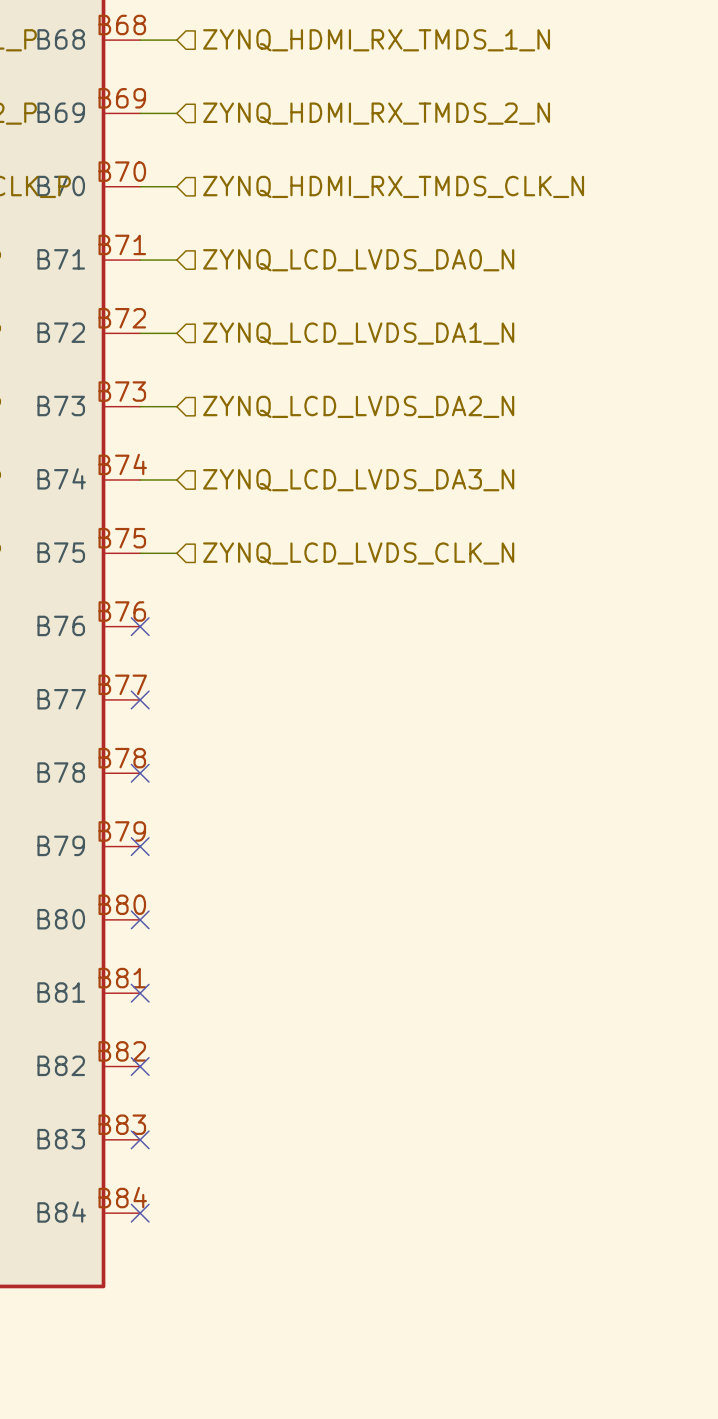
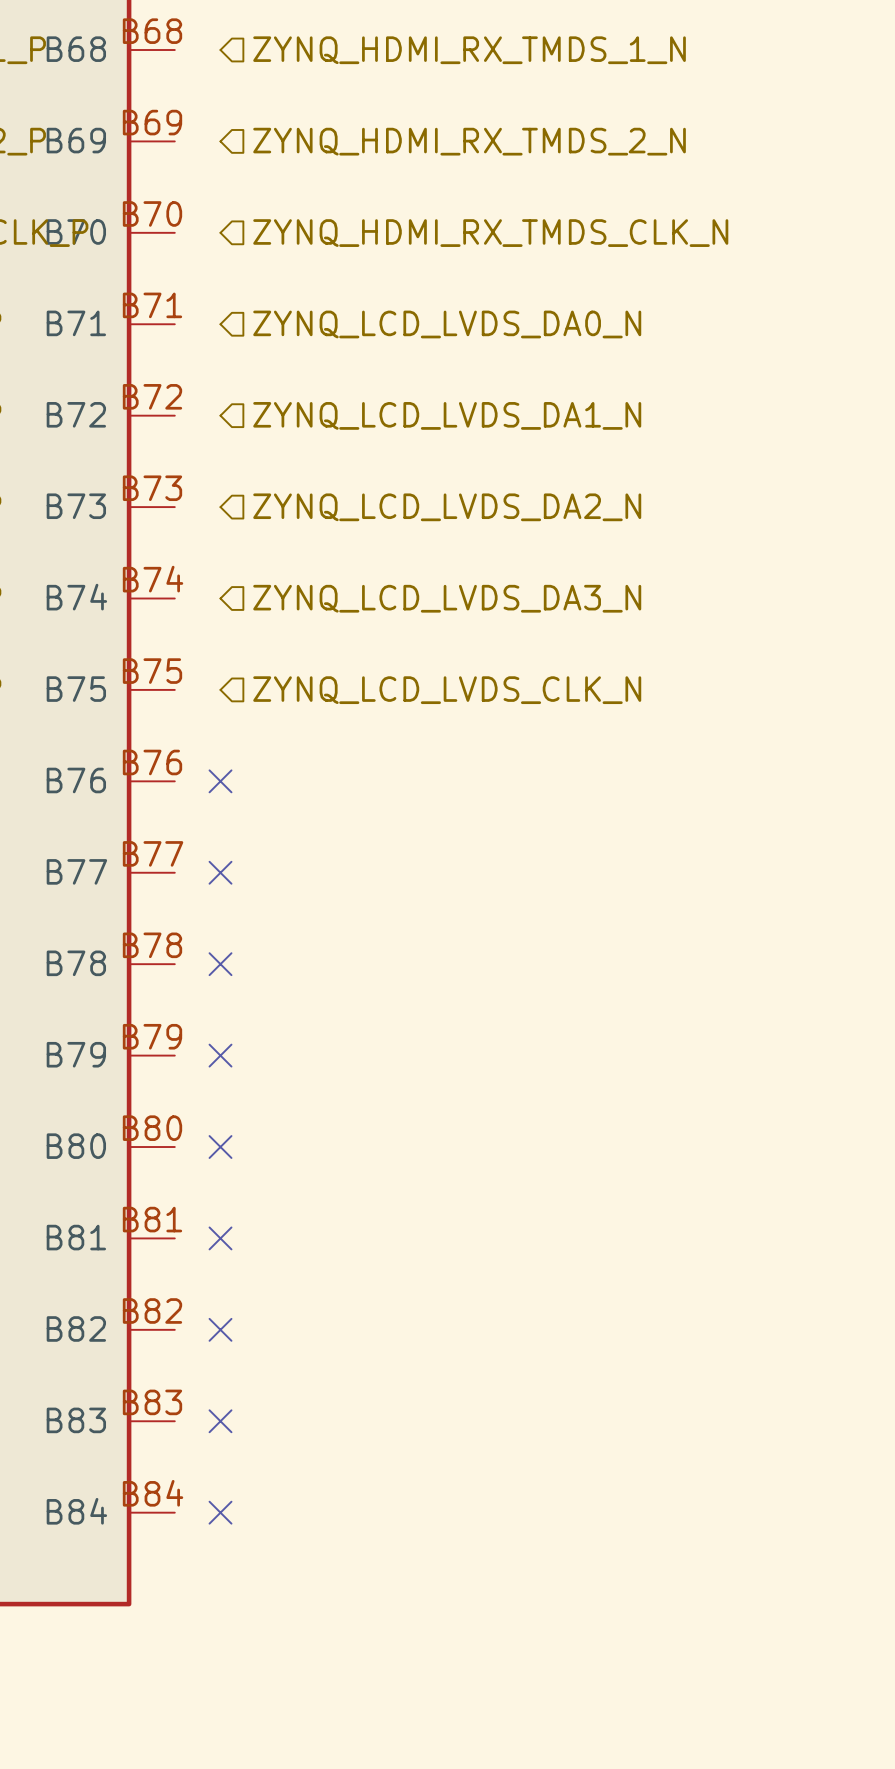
wire: (140, 40) (176, 40) -> none
wire: (140, 113) (176, 113) -> none
wire: (140, 186) (176, 186) -> none
wire: (140, 260) (176, 260) -> none
wire: (140, 333) (176, 333) -> none
wire: (140, 406) (176, 406) -> none
wire: (140, 479) (176, 479) -> none
wire: (140, 553) (176, 553) -> none
no-connect mark position: (140, 626) -> (220, 781)
no-connect mark position: (140, 699) -> (220, 872)
no-connect mark position: (140, 773) -> (220, 964)
no-connect mark position: (140, 846) -> (220, 1055)
no-connect mark position: (140, 919) -> (220, 1147)
no-connect mark position: (140, 993) -> (220, 1238)
no-connect mark position: (140, 1066) -> (220, 1329)
no-connect mark position: (140, 1139) -> (220, 1421)
no-connect mark position: (140, 1213) -> (220, 1512)

